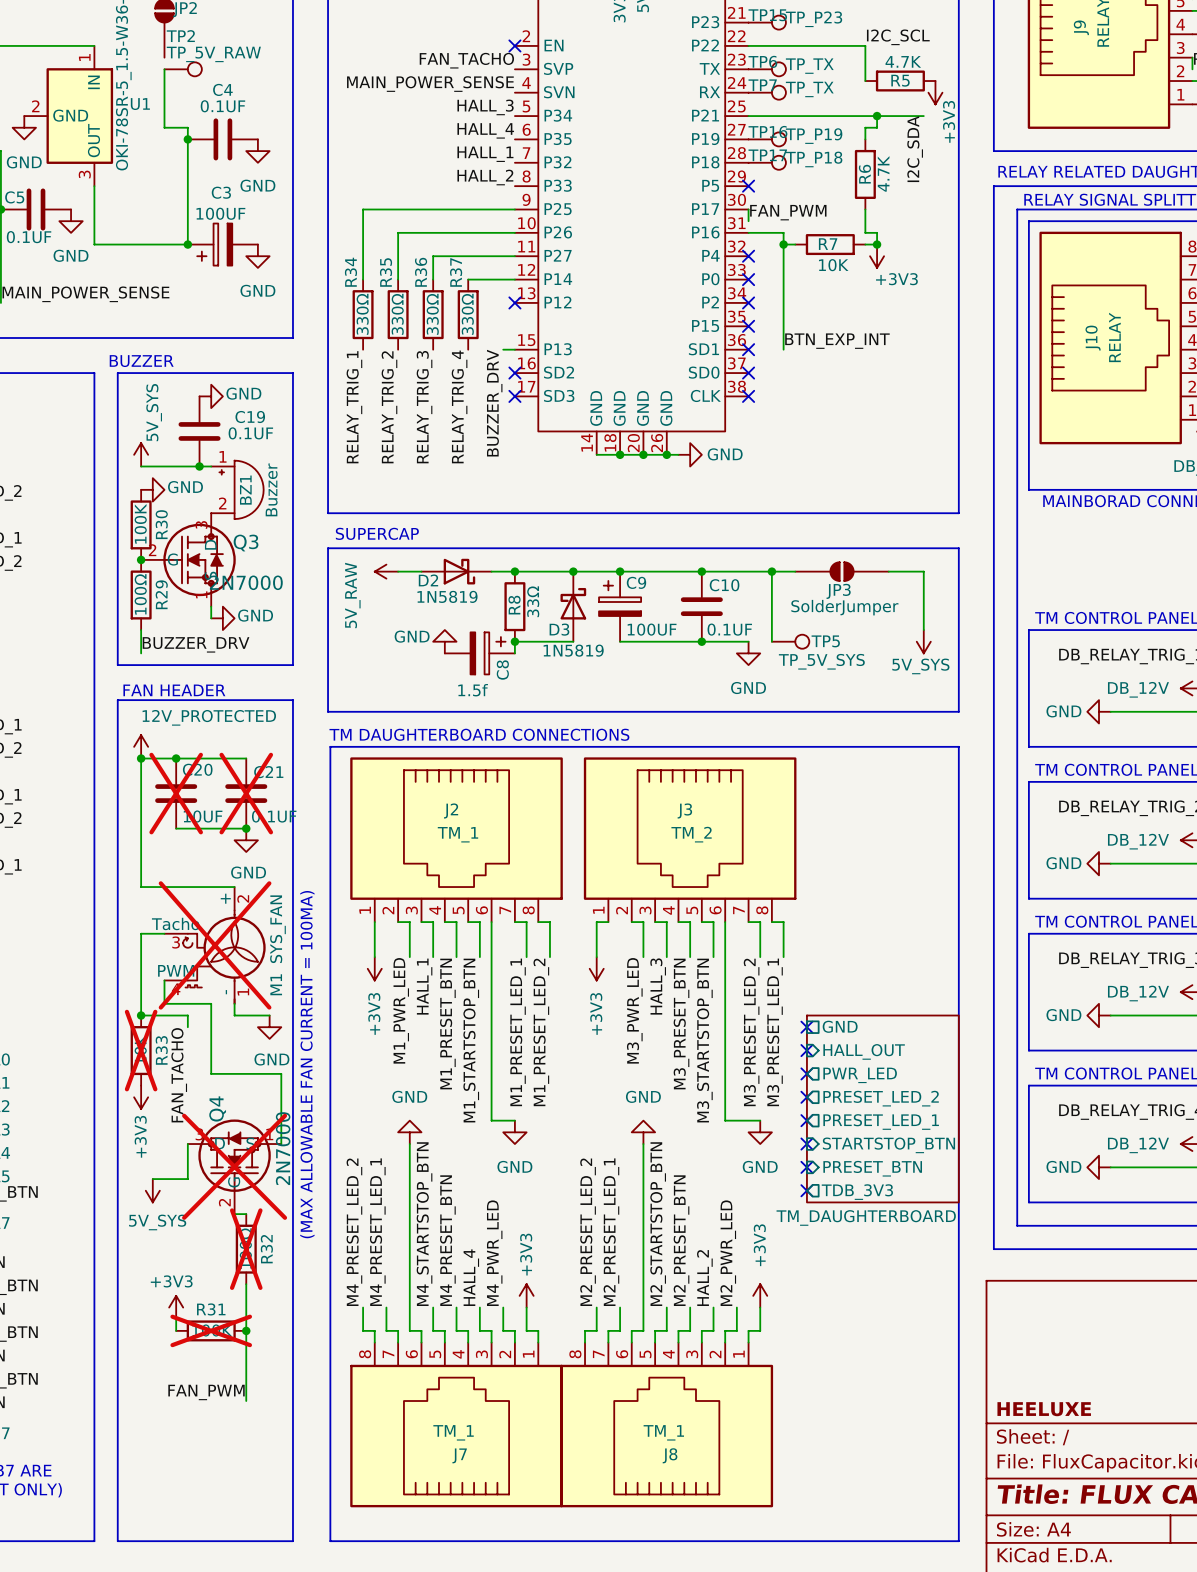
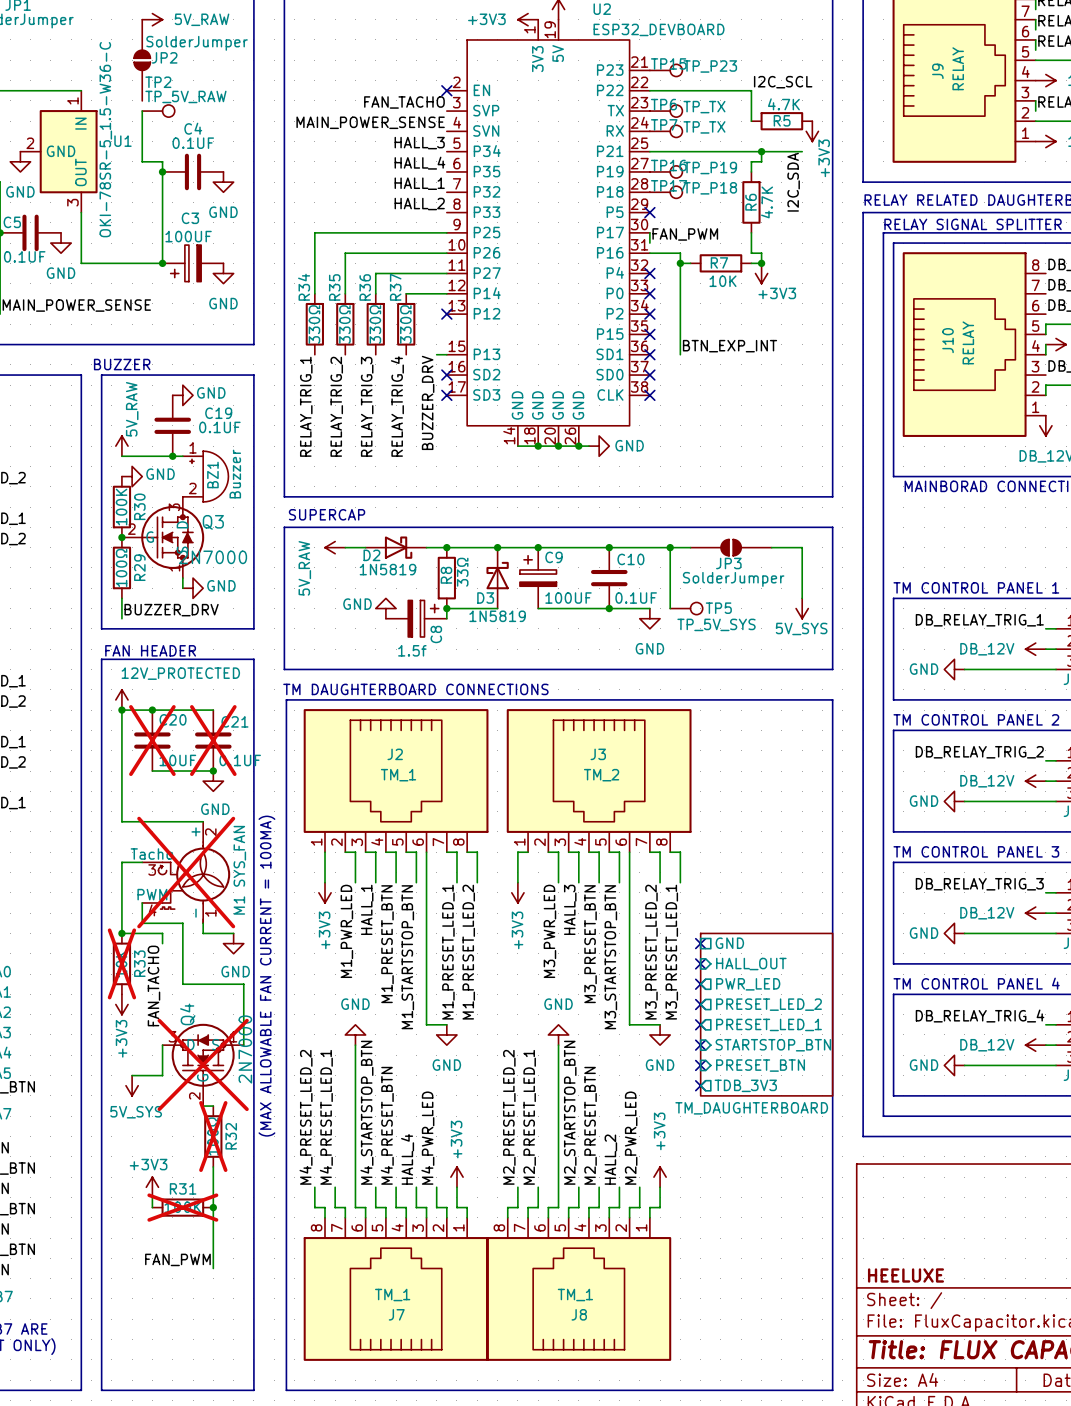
power symbol: 5V_SYS (141, 454) -> 5V_RAW (121, 446)

